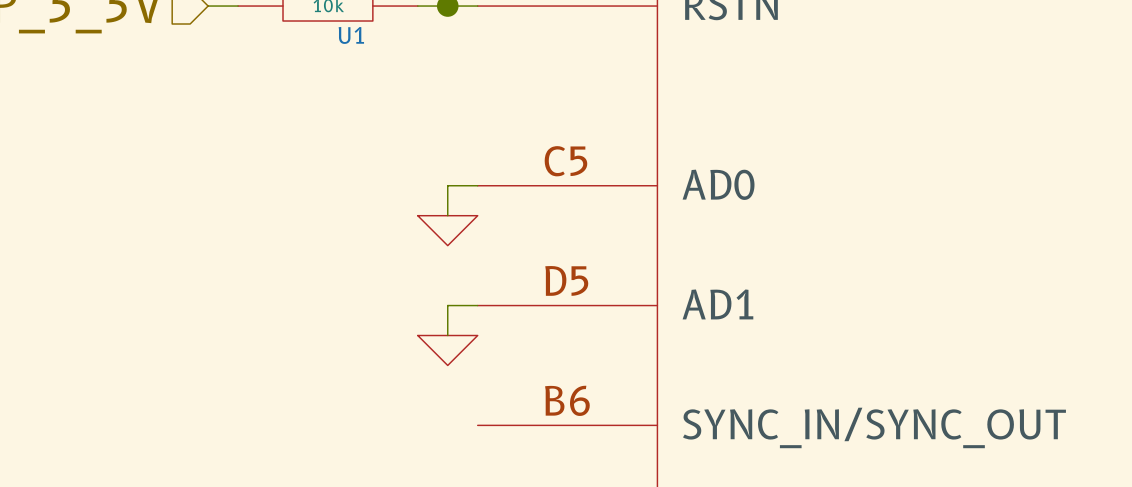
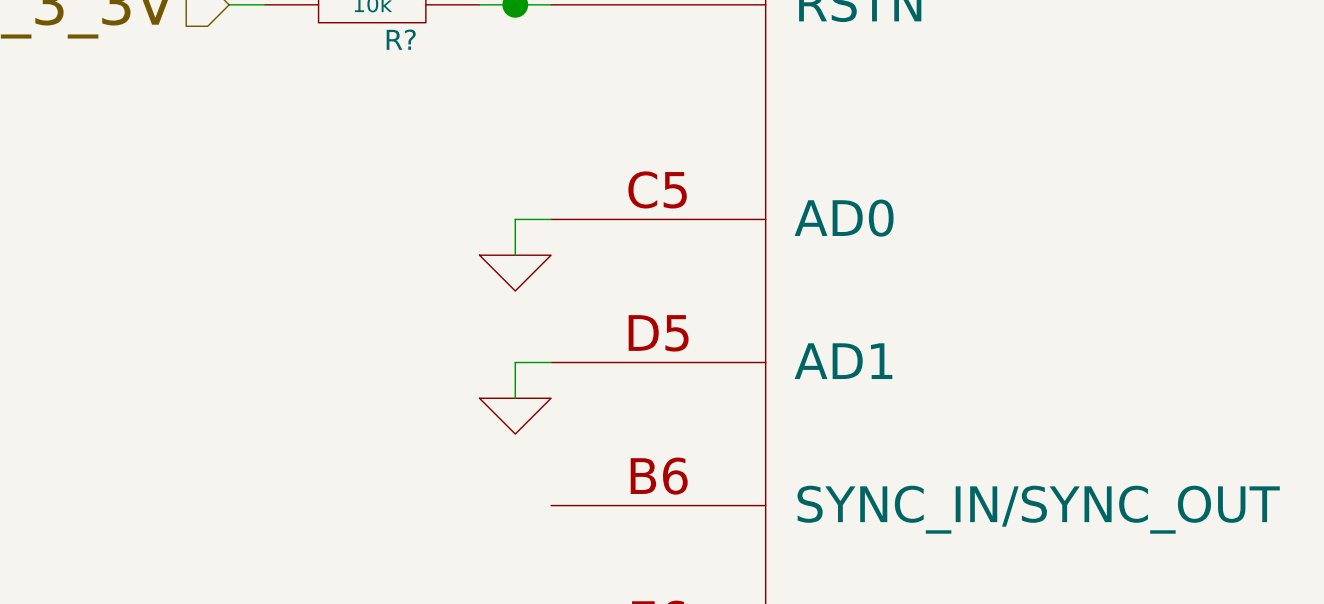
U1 name: U1 (351, 35) -> R? (401, 39)

